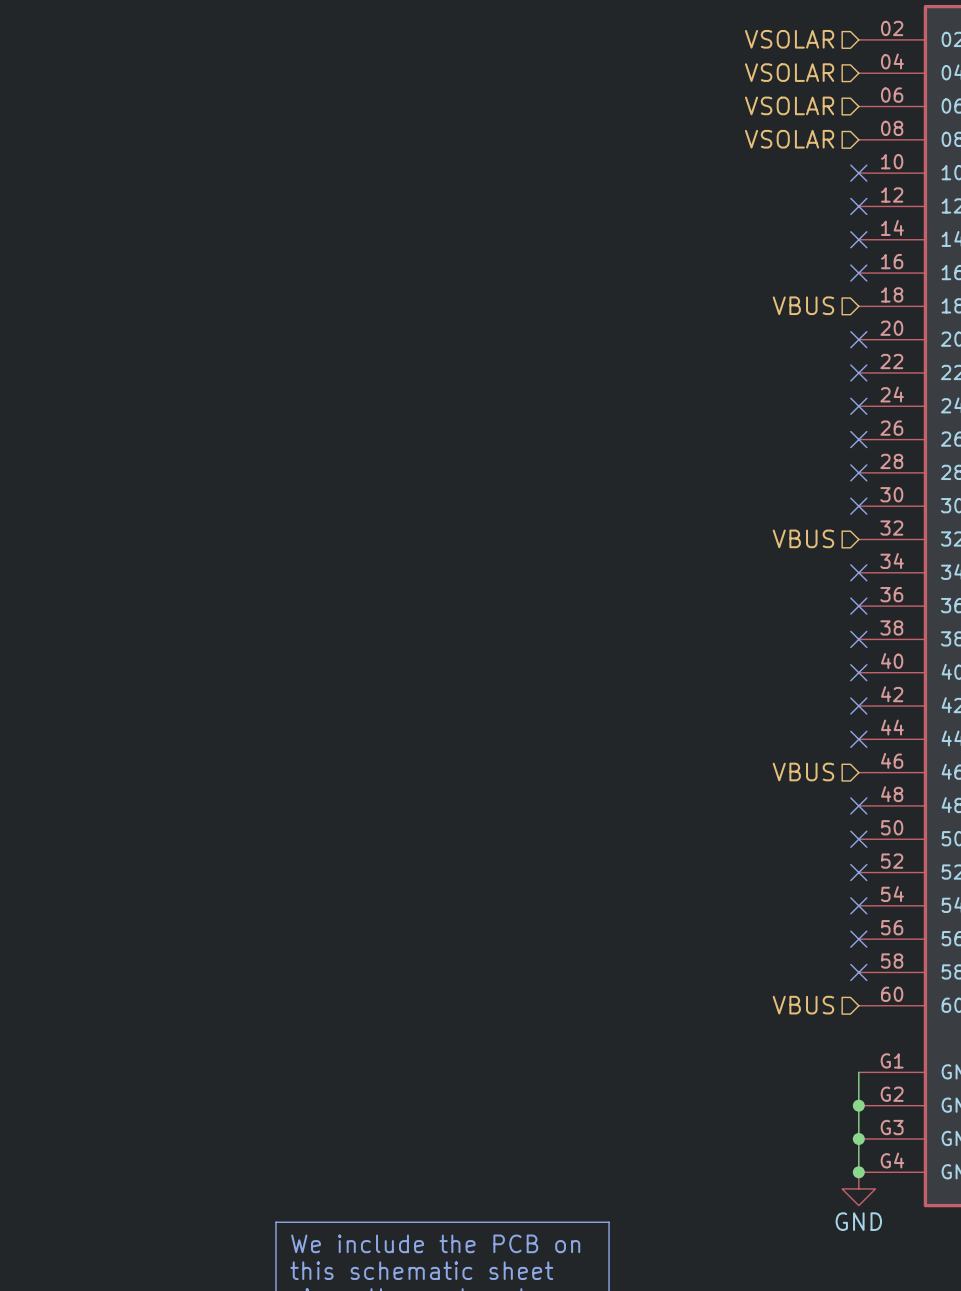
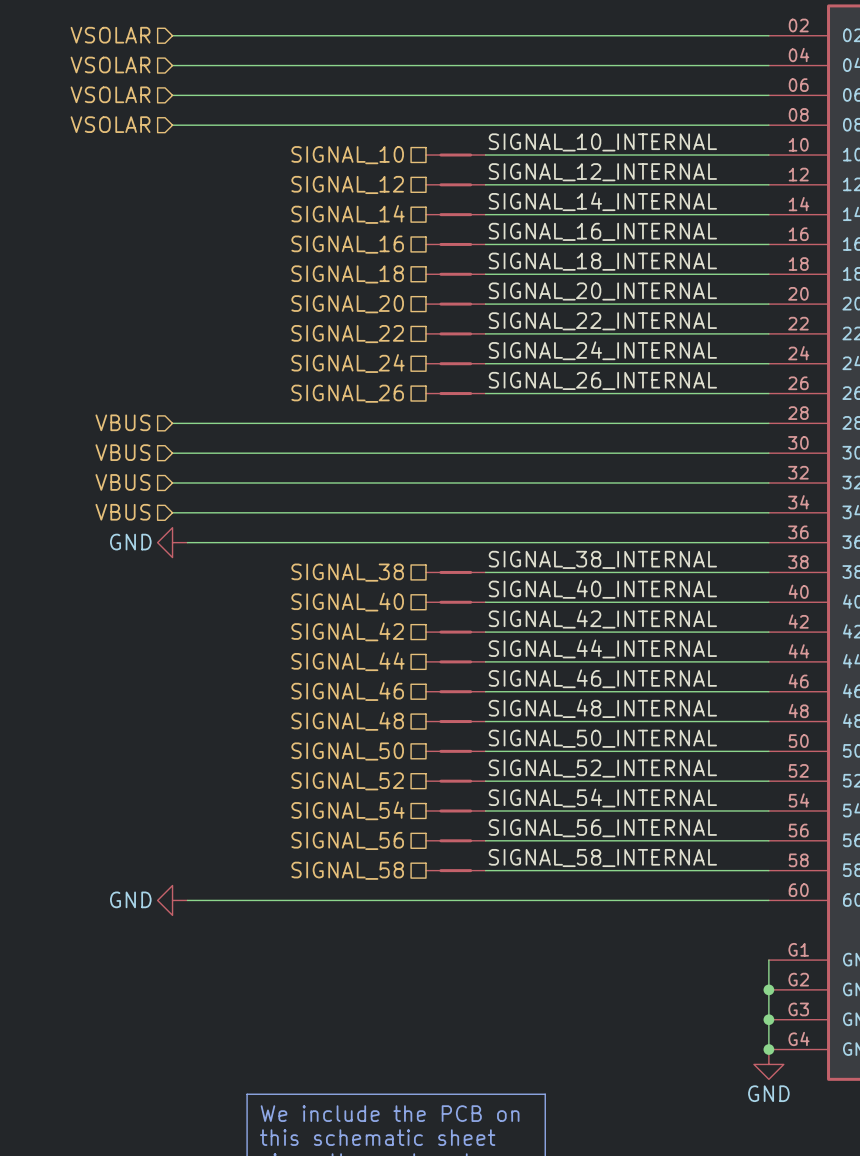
hierarchical label: none -> VSOLAR (110, 35)
wire: none -> (172, 35) (768, 35)
hierarchical label: VSOLAR (789, 39) -> none
hierarchical label: none -> VSOLAR (110, 65)
hierarchical label: VSOLAR (789, 72) -> none
wire: none -> (172, 65) (768, 65)
hierarchical label: none -> VSOLAR (110, 94)
hierarchical label: VSOLAR (789, 105) -> none
wire: none -> (172, 95) (768, 95)
hierarchical label: none -> VSOLAR (110, 124)
wire: none -> (172, 125) (768, 125)
hierarchical label: VSOLAR (789, 139) -> none
label: none -> SIGNAL_10_INTERNAL (602, 142)
hierarchical label: none -> SIGNAL_10 (347, 155)
part: none -> (455, 155)
wire: none -> (485, 155) (768, 155)
no-connect mark: (858, 173) -> none
label: none -> SIGNAL_12_INTERNAL (602, 172)
hierarchical label: none -> SIGNAL_12 (347, 184)
part: none -> (455, 184)
wire: none -> (485, 184) (768, 184)
no-connect mark: (858, 206) -> none
label: none -> SIGNAL_14_INTERNAL (602, 201)
hierarchical label: none -> SIGNAL_14 (348, 214)
part: none -> (455, 214)
wire: none -> (485, 214) (768, 214)
no-connect mark: (858, 239) -> none
label: none -> SIGNAL_16_INTERNAL (602, 231)
hierarchical label: none -> SIGNAL_16 (347, 244)
part: none -> (455, 244)
wire: none -> (485, 244) (768, 244)
no-connect mark: (858, 273) -> none
label: none -> SIGNAL_18_INTERNAL (602, 261)
hierarchical label: VBUS (803, 305) -> none
hierarchical label: none -> SIGNAL_18 (347, 274)
part: none -> (455, 274)
wire: none -> (485, 274) (768, 274)
label: none -> SIGNAL_20_INTERNAL (602, 291)
hierarchical label: none -> SIGNAL_20 (347, 304)
part: none -> (455, 304)
wire: none -> (485, 304) (768, 304)
no-connect mark: (858, 339) -> none
label: none -> SIGNAL_22_INTERNAL (602, 321)
part: none -> (455, 333)
wire: none -> (485, 333) (768, 333)
no-connect mark: (858, 372) -> none
hierarchical label: none -> SIGNAL_22 (347, 334)
label: none -> SIGNAL_24_INTERNAL (602, 350)
hierarchical label: none -> SIGNAL_24 (348, 363)
part: none -> (455, 363)
wire: none -> (485, 363) (768, 363)
no-connect mark: (858, 406) -> none
label: none -> SIGNAL_26_INTERNAL (602, 380)
hierarchical label: none -> SIGNAL_26 (347, 393)
part: none -> (455, 393)
wire: none -> (485, 393) (768, 393)
no-connect mark: (858, 439) -> none
hierarchical label: none -> VBUS (122, 422)
wire: none -> (172, 423) (768, 423)
no-connect mark: (858, 472) -> none
hierarchical label: none -> VBUS (122, 452)
wire: none -> (172, 453) (768, 453)
no-connect mark: (858, 506) -> none
hierarchical label: none -> VBUS (122, 482)
hierarchical label: VBUS (803, 538) -> none
wire: none -> (172, 483) (768, 483)
hierarchical label: none -> VBUS (122, 512)
wire: none -> (172, 512) (768, 512)
no-connect mark: (858, 572) -> none
power symbol: none -> GND (172, 542)
wire: none -> (187, 542) (768, 542)
no-connect mark: (858, 606) -> none
label: none -> SIGNAL_38_INTERNAL (602, 559)
hierarchical label: none -> SIGNAL_38 (347, 572)
part: none -> (455, 572)
wire: none -> (485, 572) (768, 572)
no-connect mark: (858, 639) -> none
label: none -> SIGNAL_40_INTERNAL (602, 589)
hierarchical label: none -> SIGNAL_40 (347, 602)
part: none -> (455, 602)
wire: none -> (485, 602) (768, 602)
no-connect mark: (858, 672) -> none
label: none -> SIGNAL_42_INTERNAL (602, 619)
hierarchical label: none -> SIGNAL_42 (347, 631)
part: none -> (455, 632)
wire: none -> (485, 632) (768, 632)
no-connect mark: (858, 706) -> none
label: none -> SIGNAL_44_INTERNAL (602, 648)
hierarchical label: none -> SIGNAL_44 (348, 661)
part: none -> (455, 661)
wire: none -> (485, 661) (768, 661)
no-connect mark: (858, 739) -> none
label: none -> SIGNAL_46_INTERNAL (602, 678)
hierarchical label: none -> SIGNAL_46 (347, 691)
part: none -> (455, 691)
wire: none -> (485, 691) (768, 691)
hierarchical label: VBUS (803, 772) -> none
label: none -> SIGNAL_48_INTERNAL (602, 708)
hierarchical label: none -> SIGNAL_48 (347, 721)
part: none -> (455, 721)
wire: none -> (485, 721) (768, 721)
no-connect mark: (858, 805) -> none
label: none -> SIGNAL_50_INTERNAL (602, 738)
hierarchical label: none -> SIGNAL_50 (347, 751)
part: none -> (455, 751)
wire: none -> (485, 751) (768, 751)
no-connect mark: (858, 839) -> none
label: none -> SIGNAL_52_INTERNAL (602, 768)
hierarchical label: none -> SIGNAL_52 (347, 781)
part: none -> (455, 781)
wire: none -> (485, 781) (768, 781)
no-connect mark: (858, 872) -> none
label: none -> SIGNAL_54_INTERNAL (602, 798)
hierarchical label: none -> SIGNAL_54 (348, 810)
part: none -> (455, 810)
wire: none -> (485, 810) (768, 810)
no-connect mark: (858, 905) -> none
label: none -> SIGNAL_56_INTERNAL (602, 828)
hierarchical label: none -> SIGNAL_56 (347, 840)
part: none -> (455, 840)
wire: none -> (485, 840) (768, 840)
no-connect mark: (858, 939) -> none
label: none -> SIGNAL_58_INTERNAL (602, 858)
hierarchical label: none -> SIGNAL_58 (347, 870)
part: none -> (455, 870)
wire: none -> (485, 870) (768, 870)
no-connect mark: (858, 972) -> none
power symbol: none -> GND (172, 900)
wire: none -> (187, 900) (768, 900)
hierarchical label: VBUS (803, 1005) -> none

